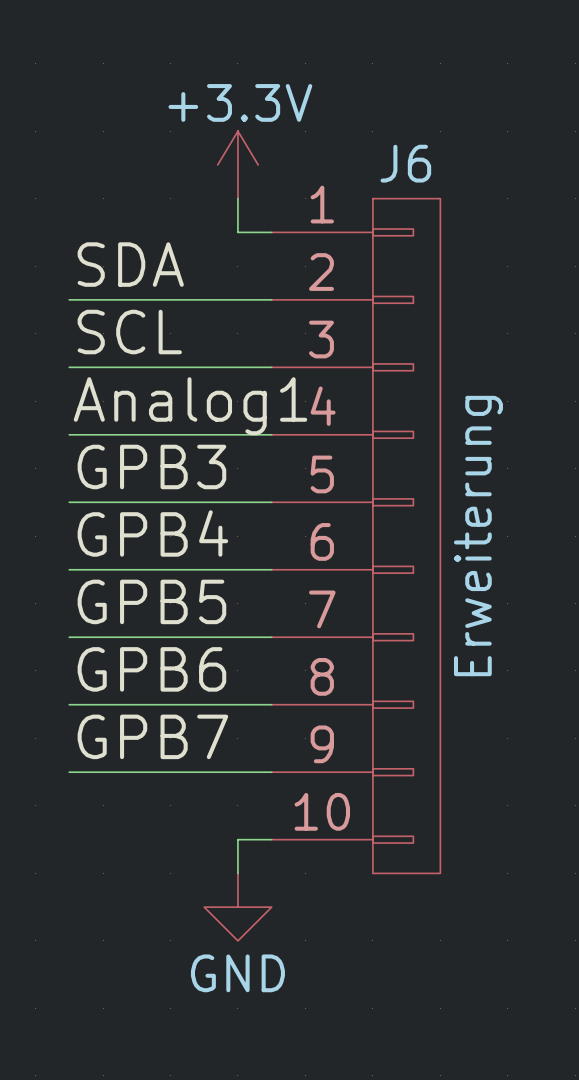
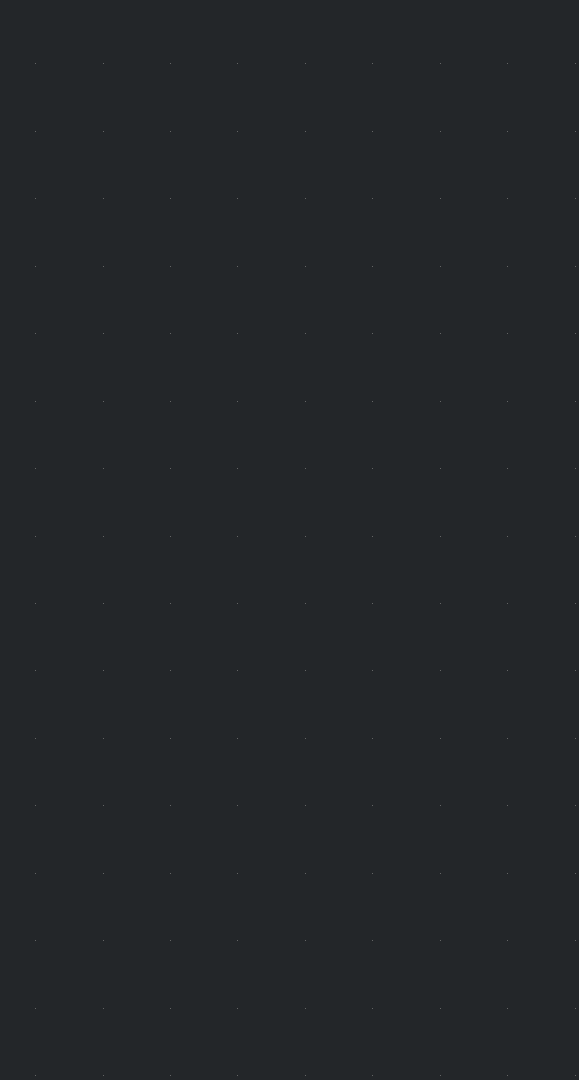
power symbol: +3.3V (237, 164) -> none
wire: (237, 198) (237, 232) (271, 232) -> none
label: SDA (130, 264) -> none
wire: (69, 299) (271, 299) -> none
label: SCL (129, 332) -> none
wire: (69, 367) (271, 367) -> none
label: Analog1 (190, 406) -> none
wire: (69, 434) (271, 434) -> none
label: GPB3 (151, 466) -> none
wire: (69, 502) (271, 502) -> none
label: GPB4 (152, 533) -> none
J6: Erweiterung (356, 536) -> none
wire: (69, 569) (271, 569) -> none
label: GPB5 (151, 601) -> none
wire: (69, 637) (271, 637) -> none
label: GPB6 (151, 669) -> none
wire: (69, 704) (271, 704) -> none
label: GPB7 (152, 736) -> none
wire: (69, 772) (271, 772) -> none
wire: (271, 839) (237, 839) (237, 873) -> none
power symbol: GND (237, 907) -> none

